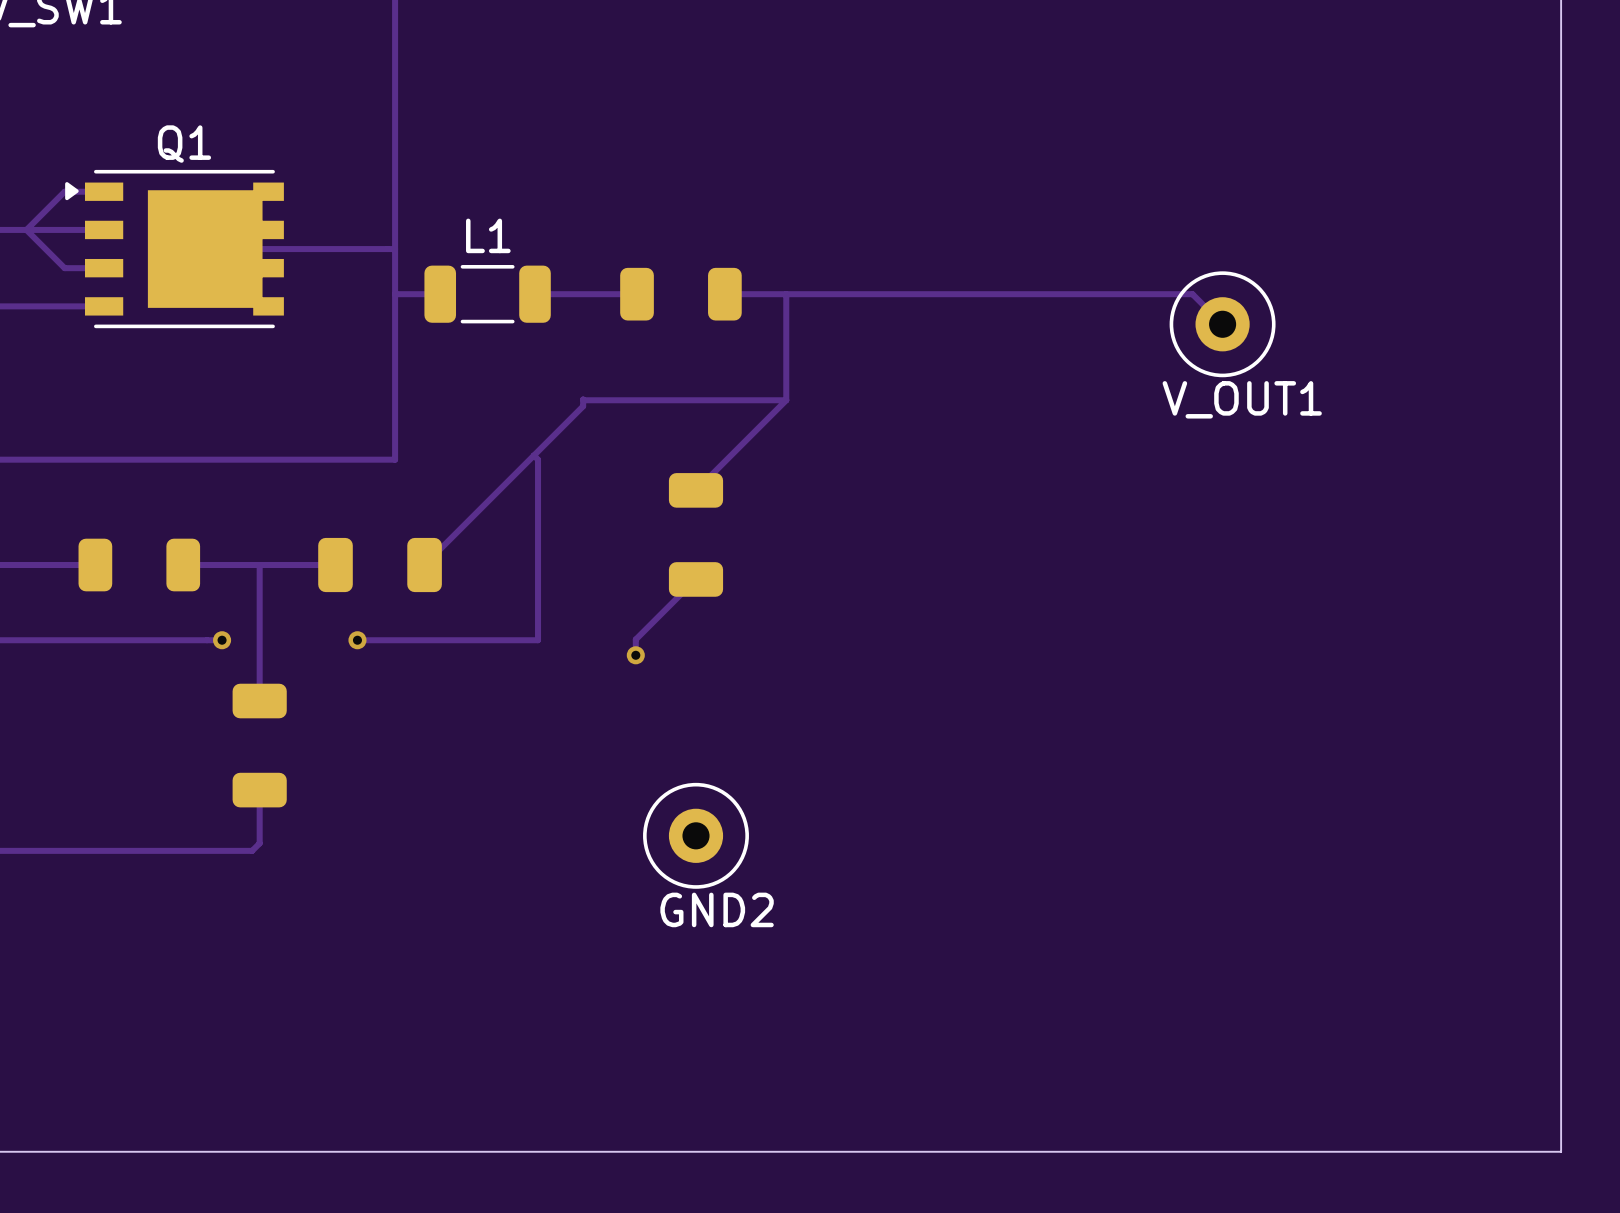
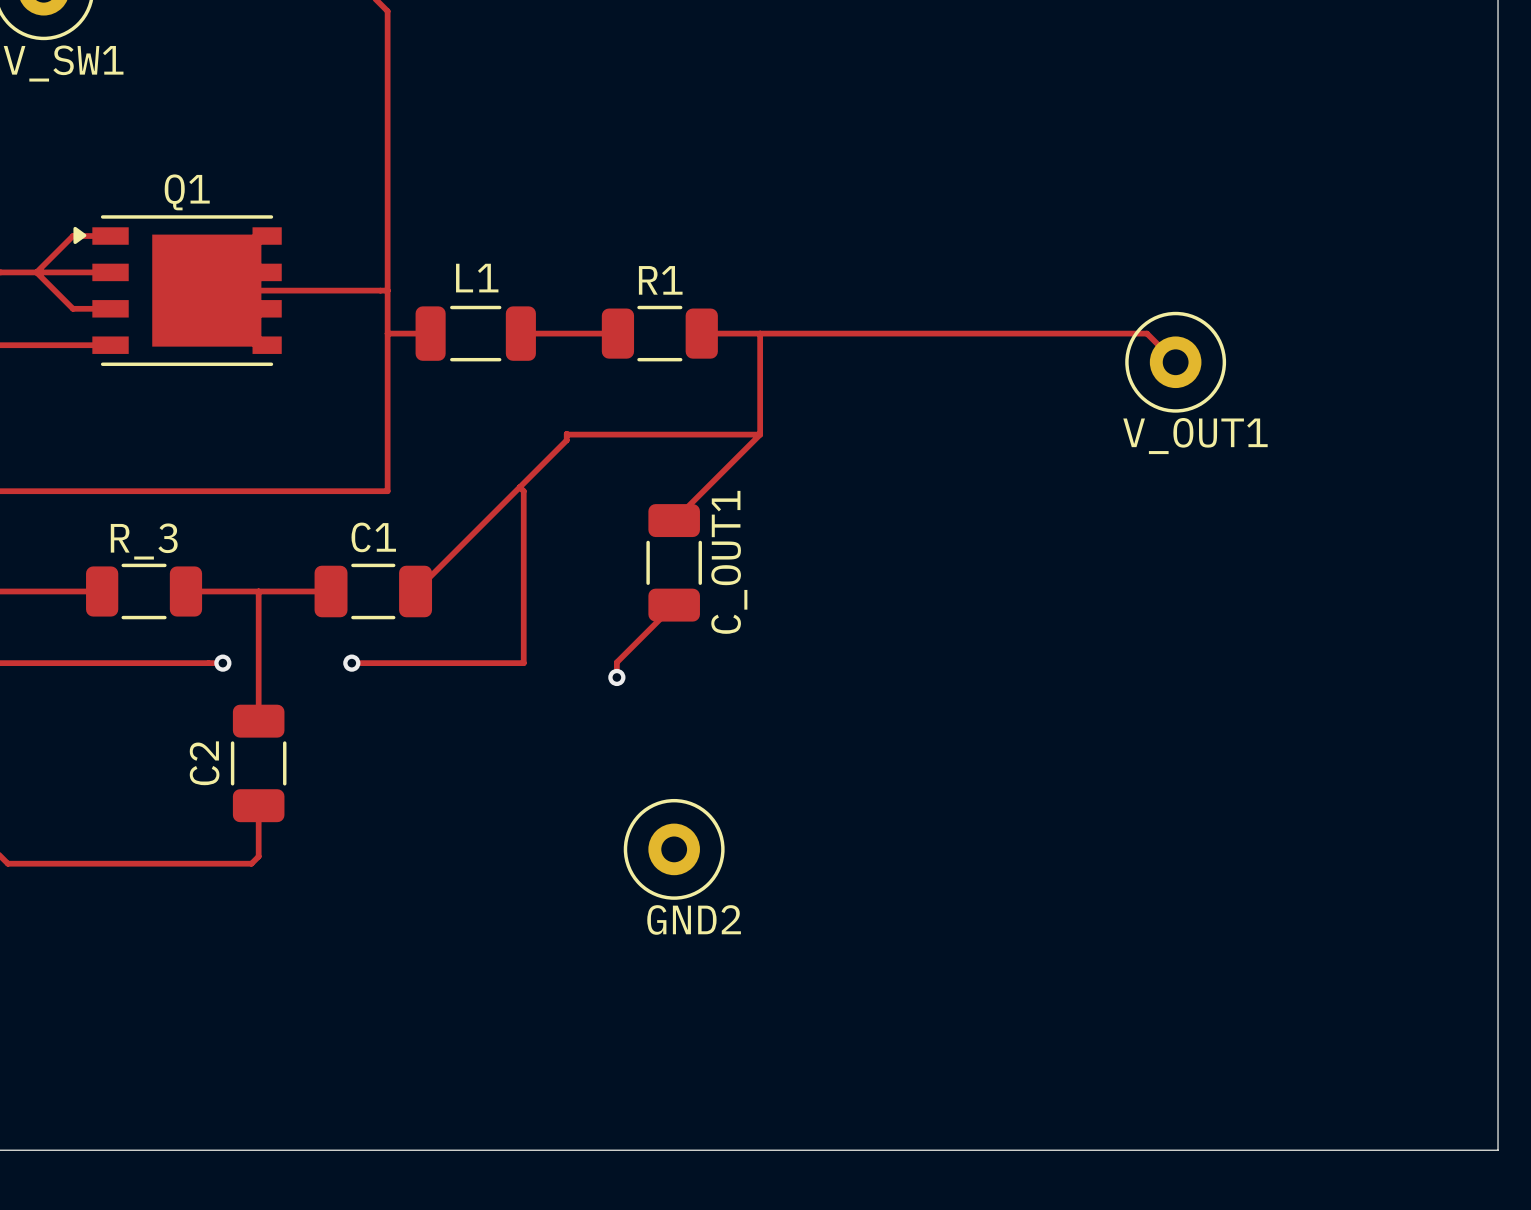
R1: none -> (659, 333)
C_OUT1: none -> (674, 562)
R_3: none -> (144, 591)
C1: none -> (373, 591)
C2: none -> (258, 763)

